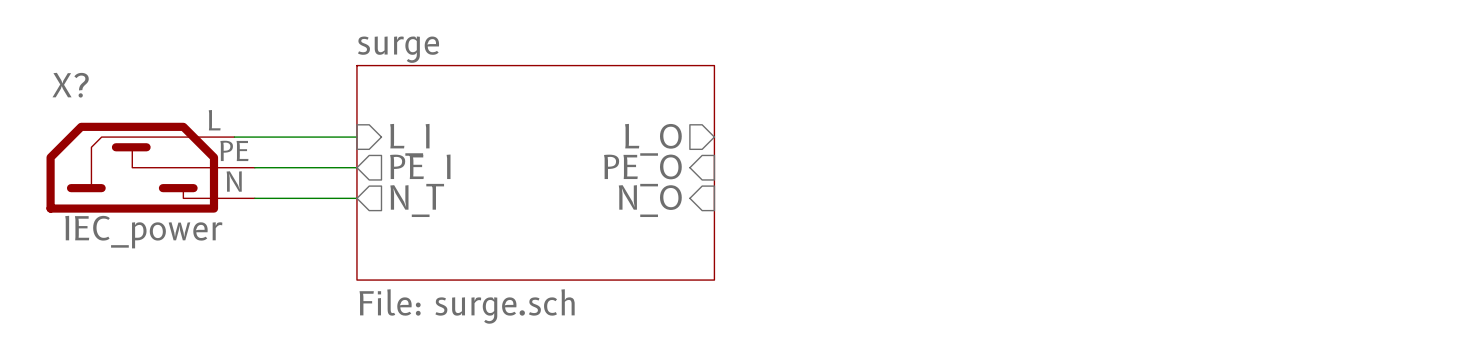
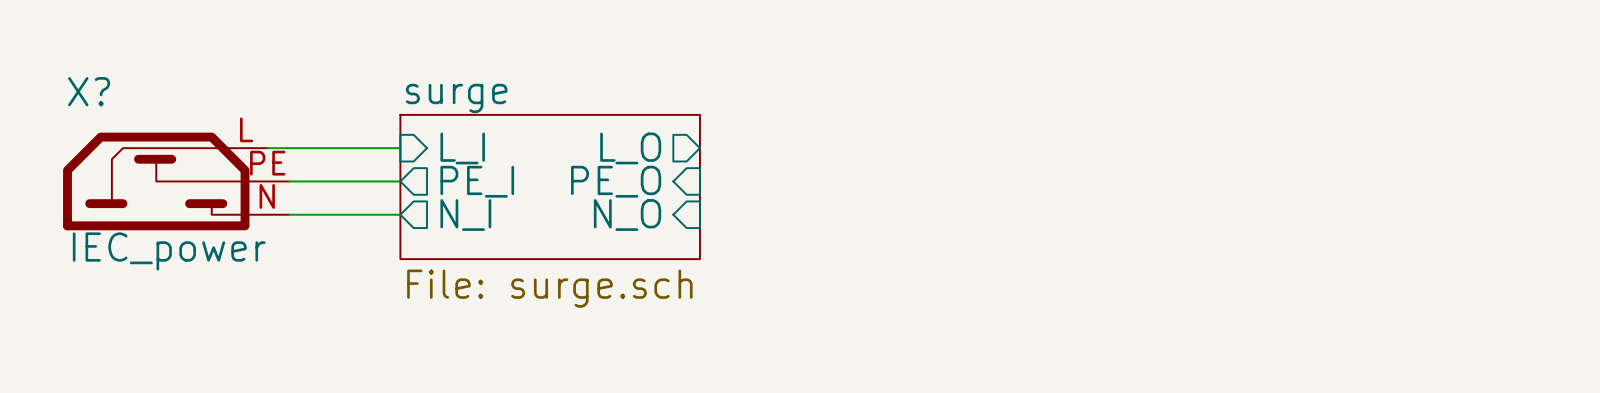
sheet pin position: L_O (653, 139) -> L_O (630, 148)
sheet pin position: PE_O (642, 170) -> PE_O (616, 181)
sheet surge: none -> File: surge.sch (550, 187)
sheet surge: File: surge.sch (535, 172) -> none
sheet pin position: N_O (650, 201) -> N_O (627, 215)

